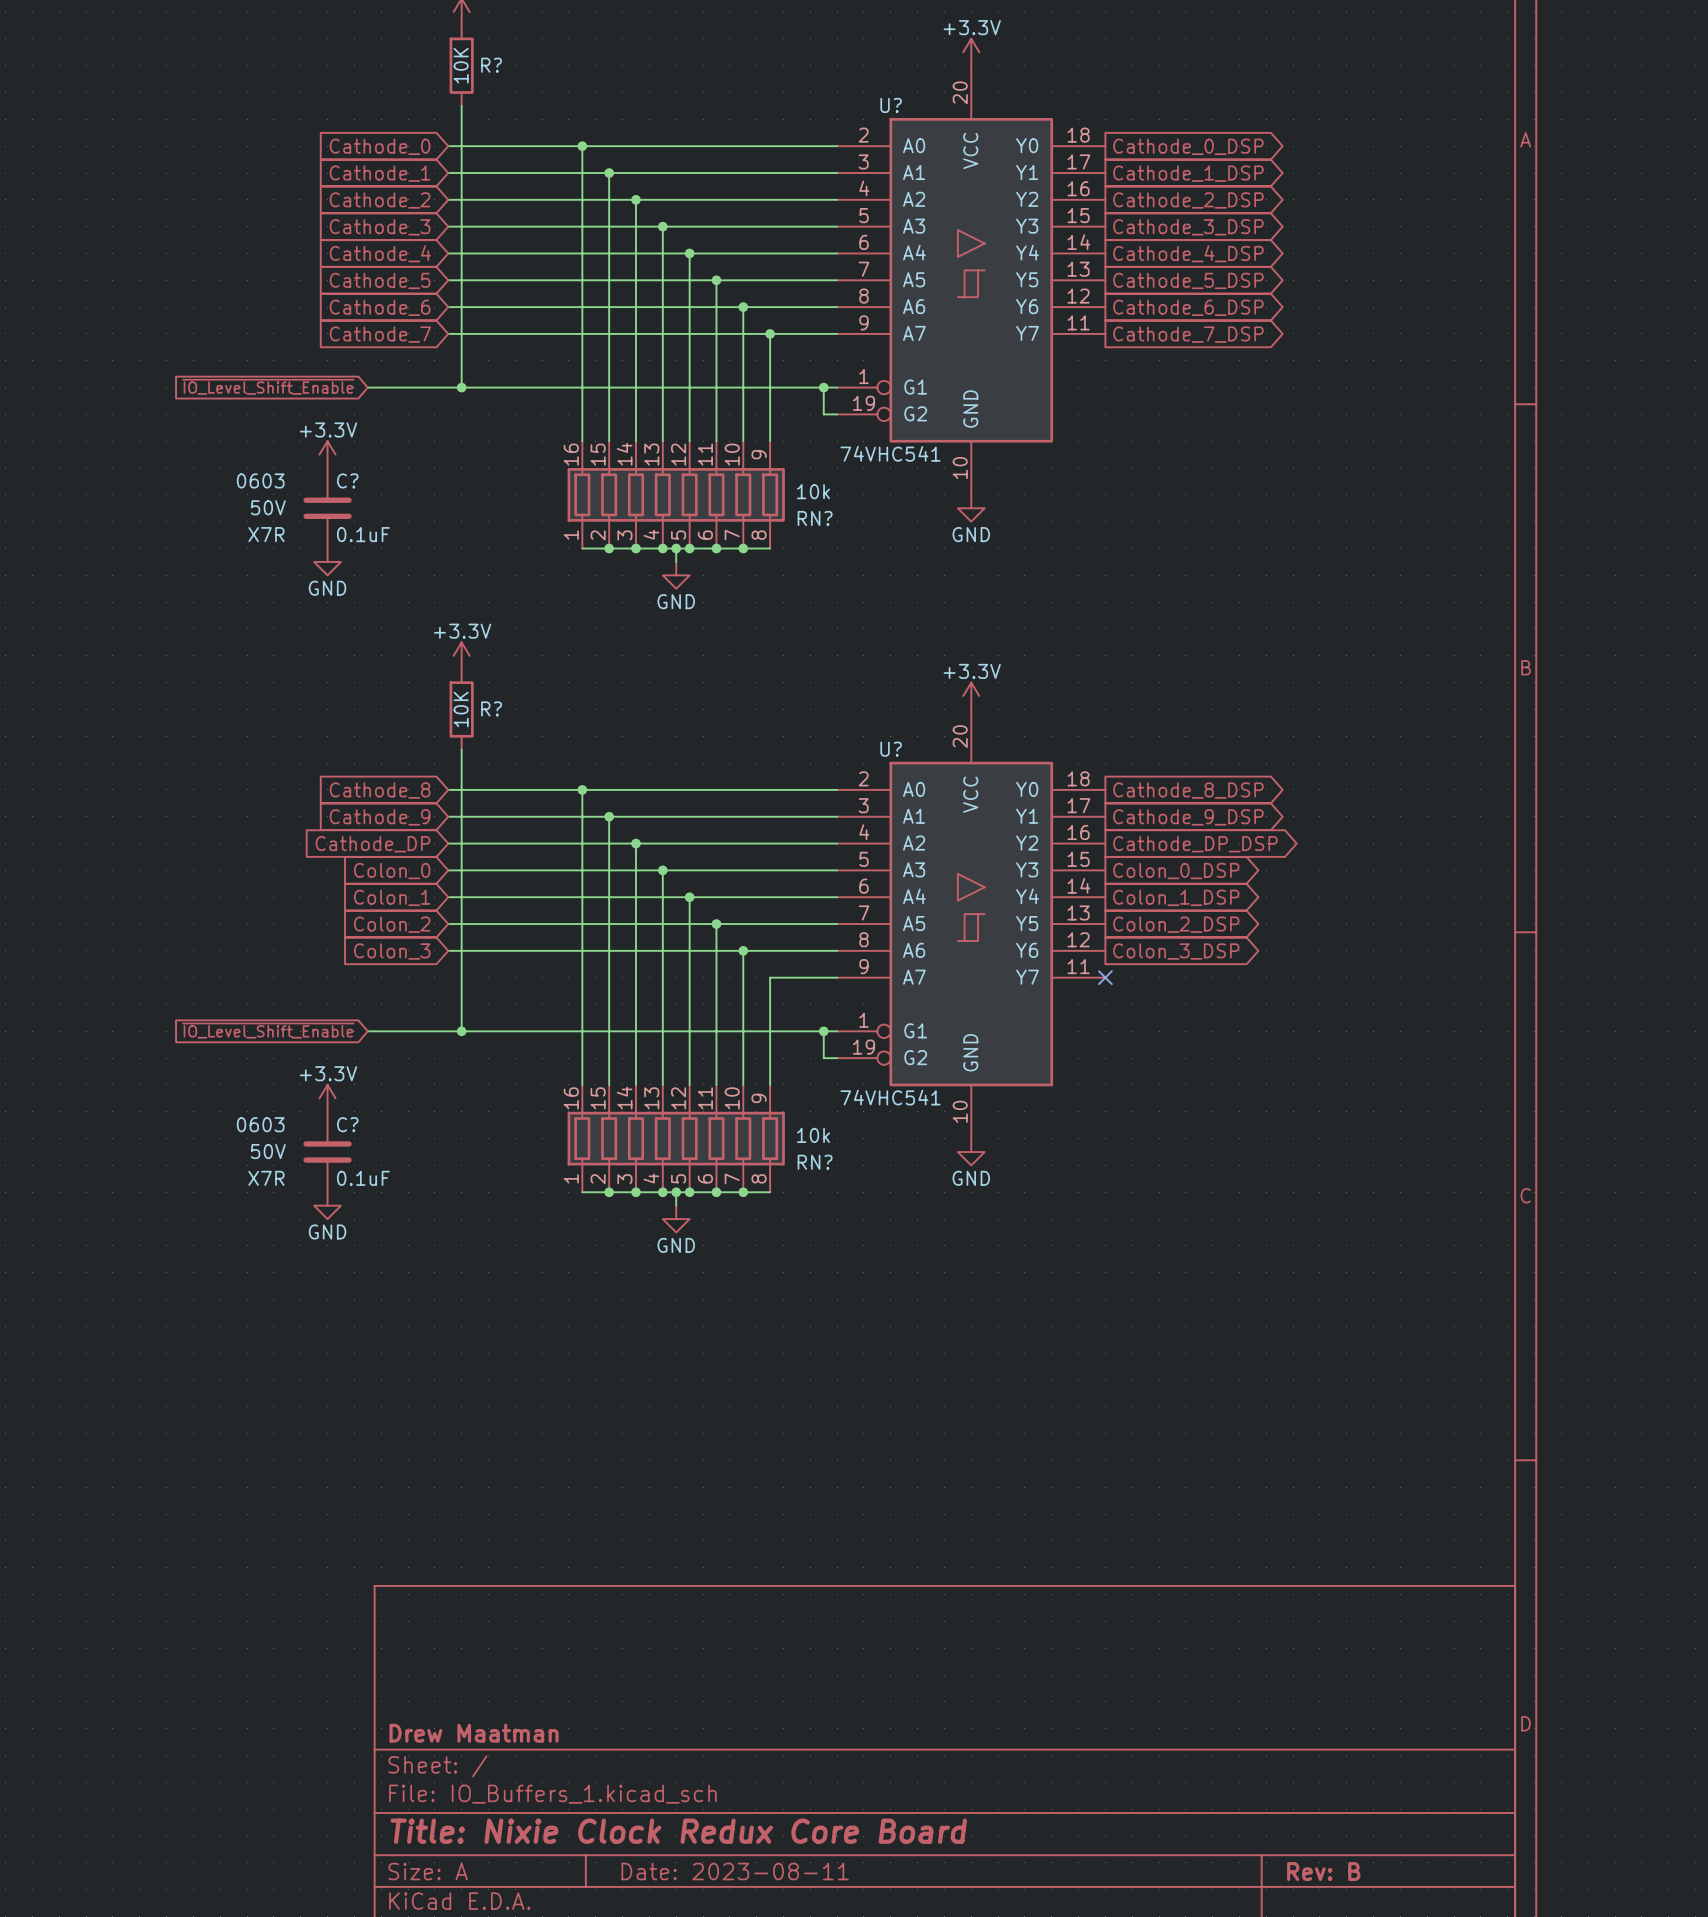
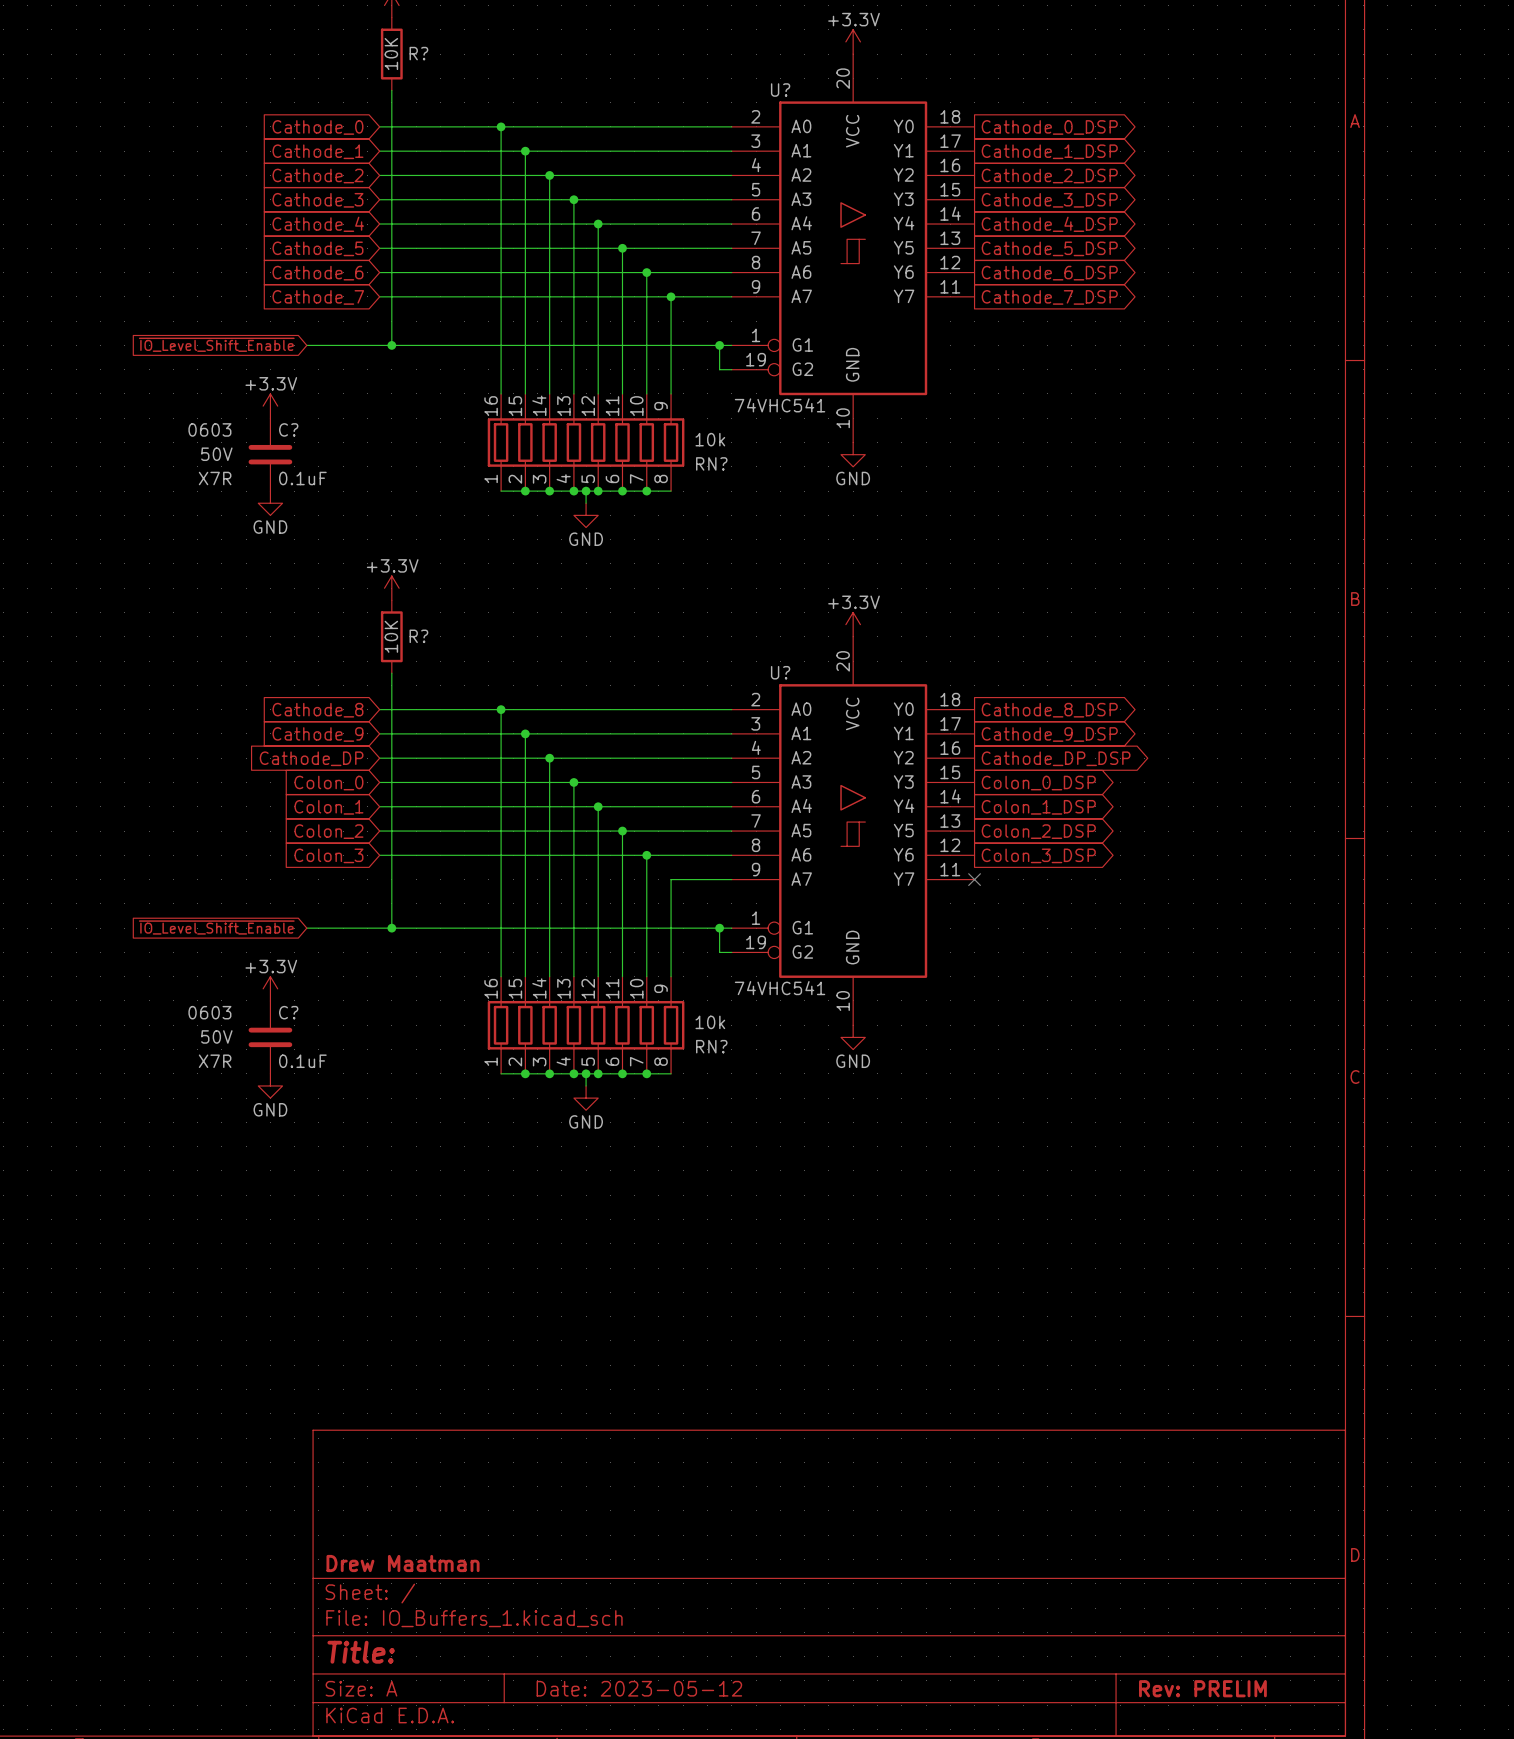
title block: Title: Nixie Clock Redux Core Board (678, 1831) -> Title: (361, 1652)
title block: Date: 2023-08-11 (735, 1871) -> Date: 2023-05-12 (639, 1688)
title block: Rev: B (1323, 1871) -> Rev: PRELIM (1202, 1688)

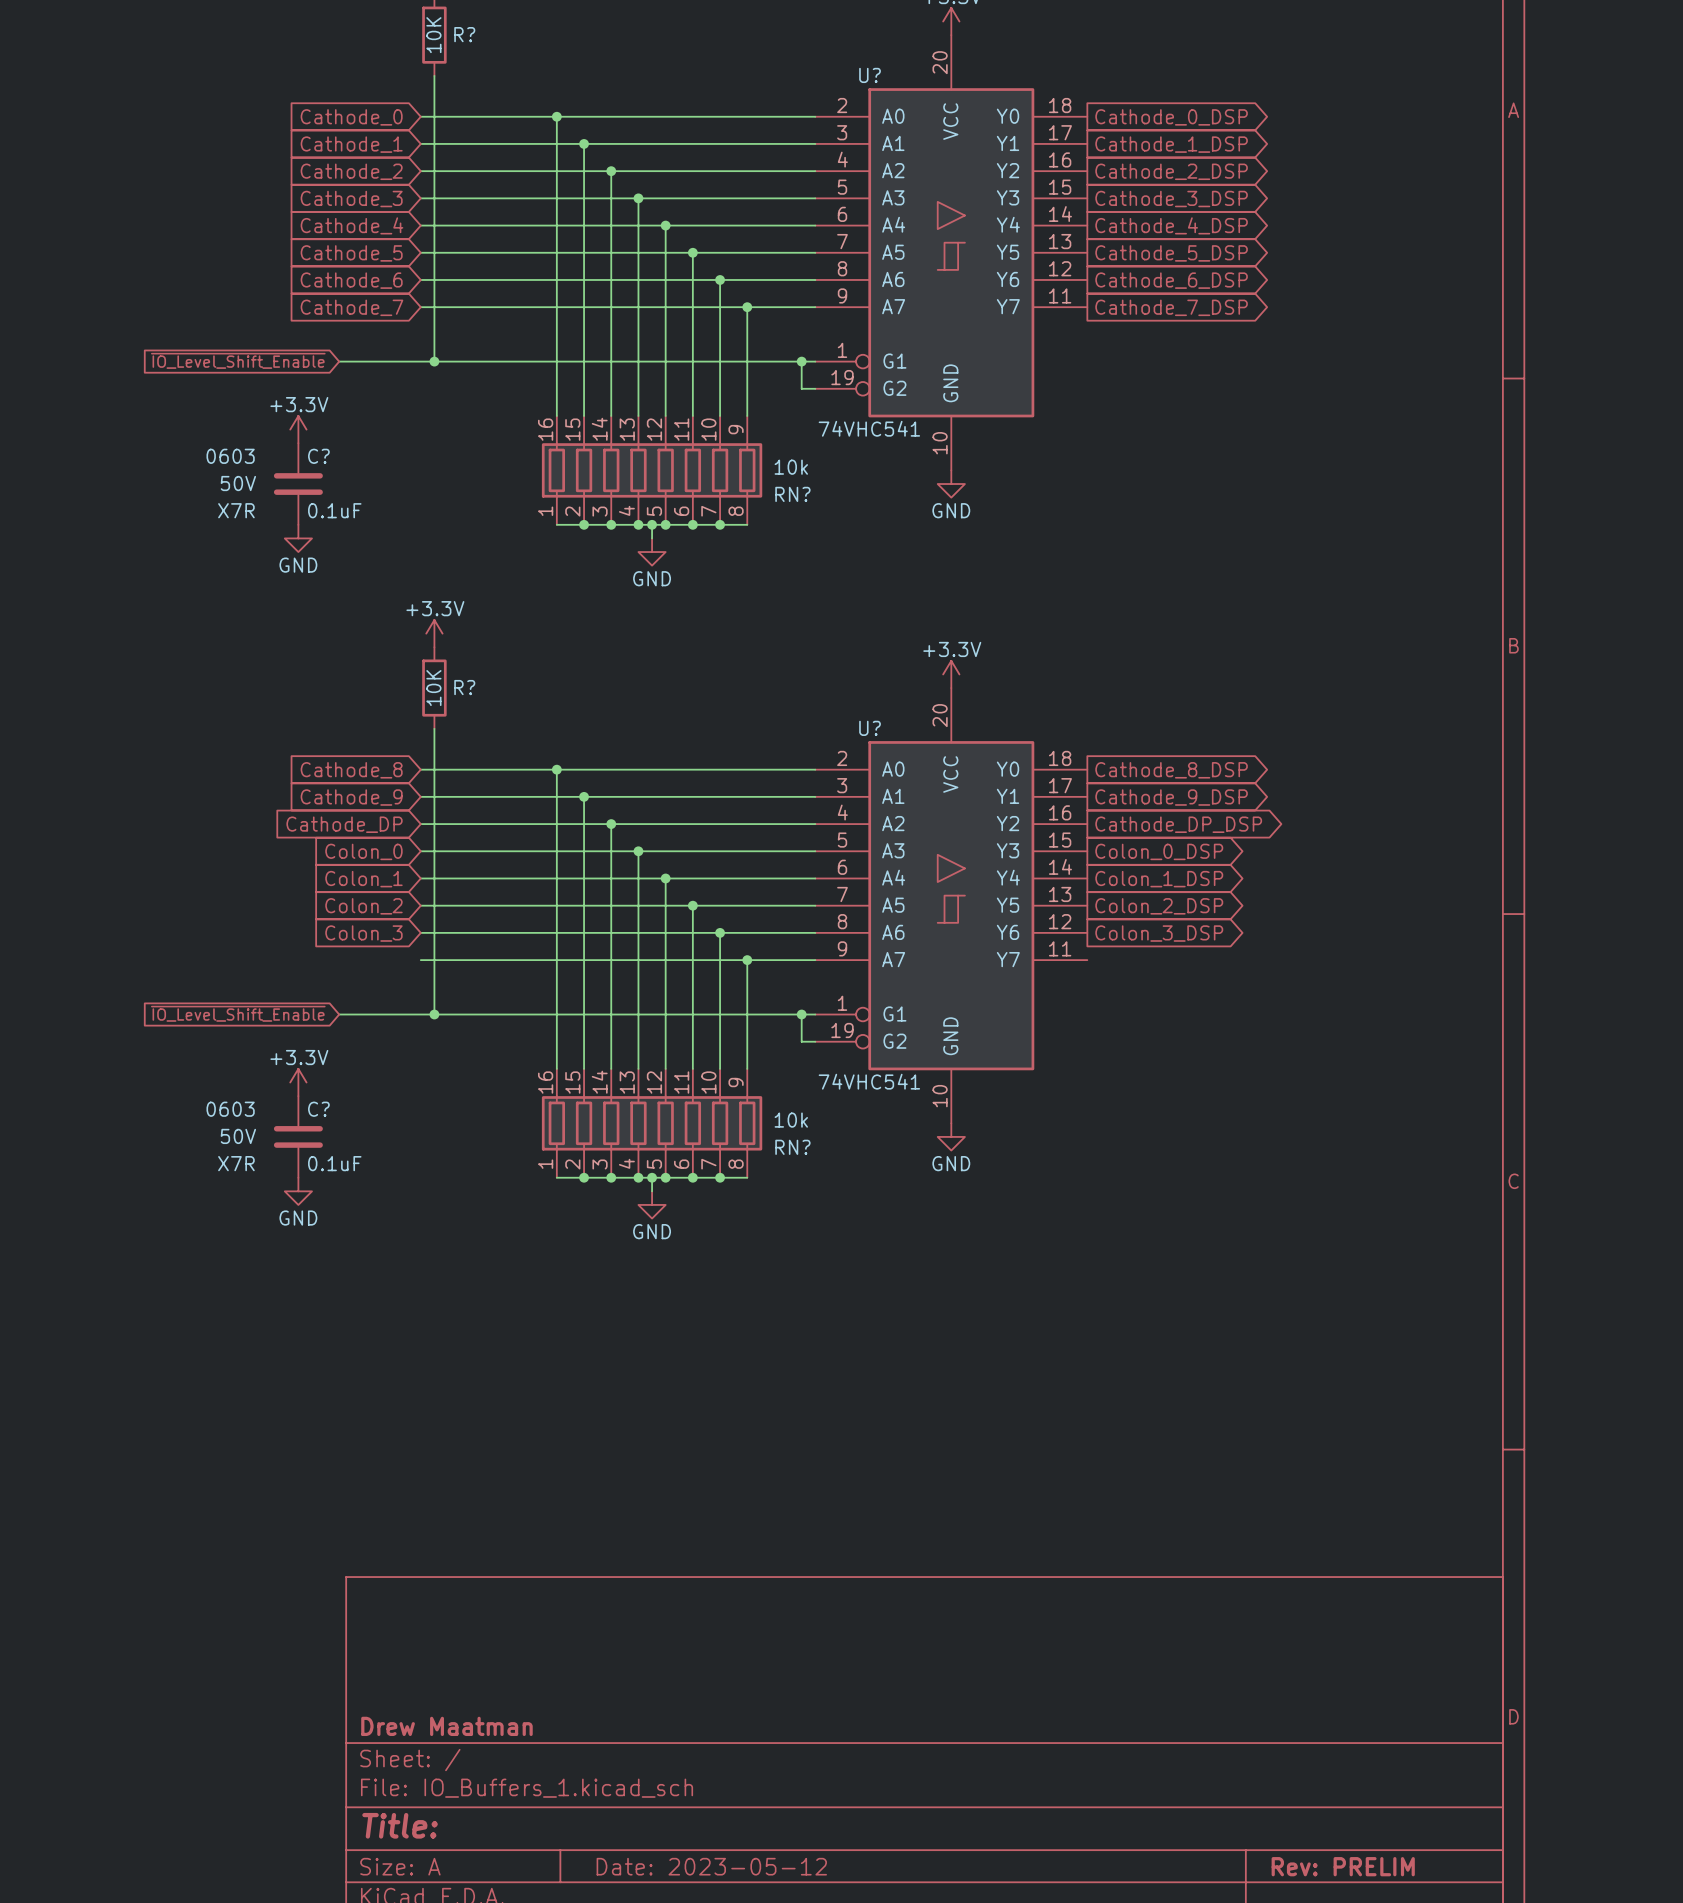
wire: none -> (420, 960) (747, 960)
junction: none -> (747, 960)
no-connect mark: (974, 879) -> none

